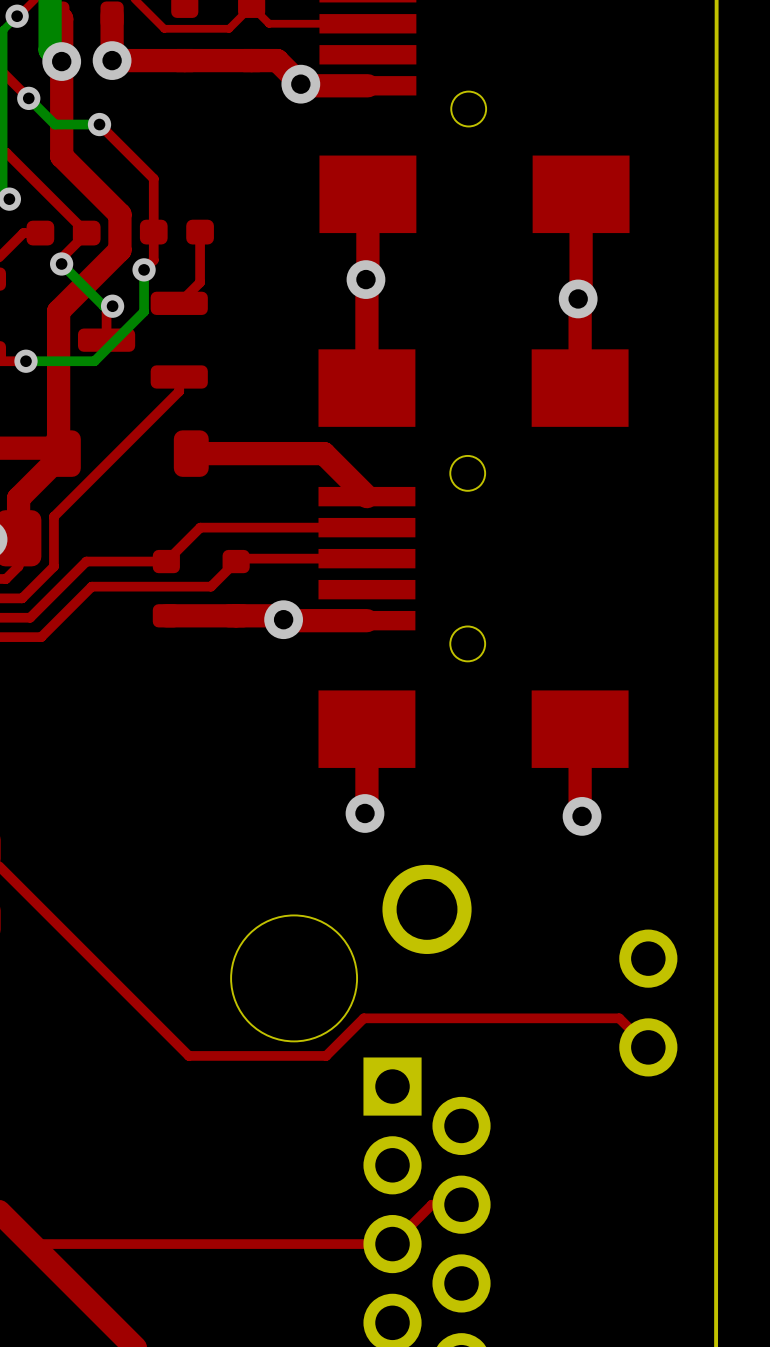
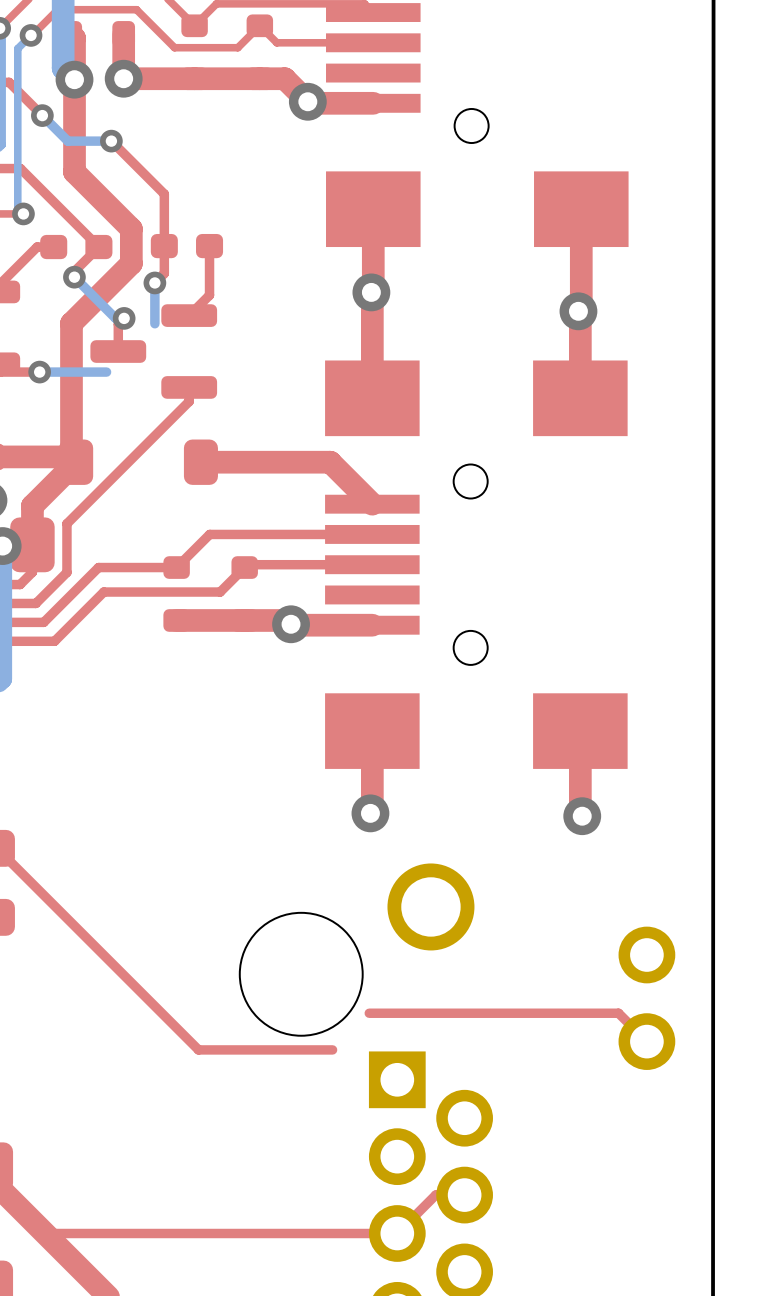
bottom track: (144, 311) (94, 361) -> none
top track: (363, 1018) (326, 1055) -> none

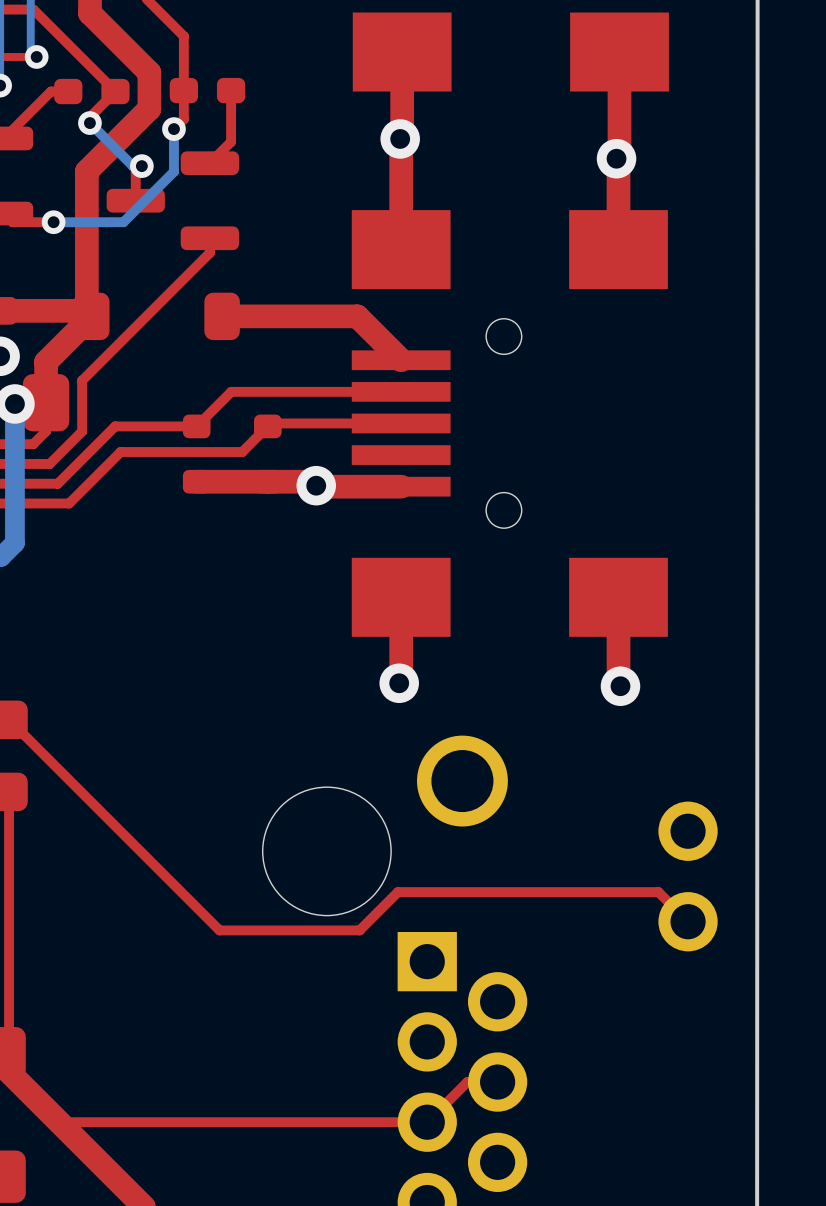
bottom track: none -> (173, 171) (123, 222)
top track: none -> (397, 892) (359, 930)

